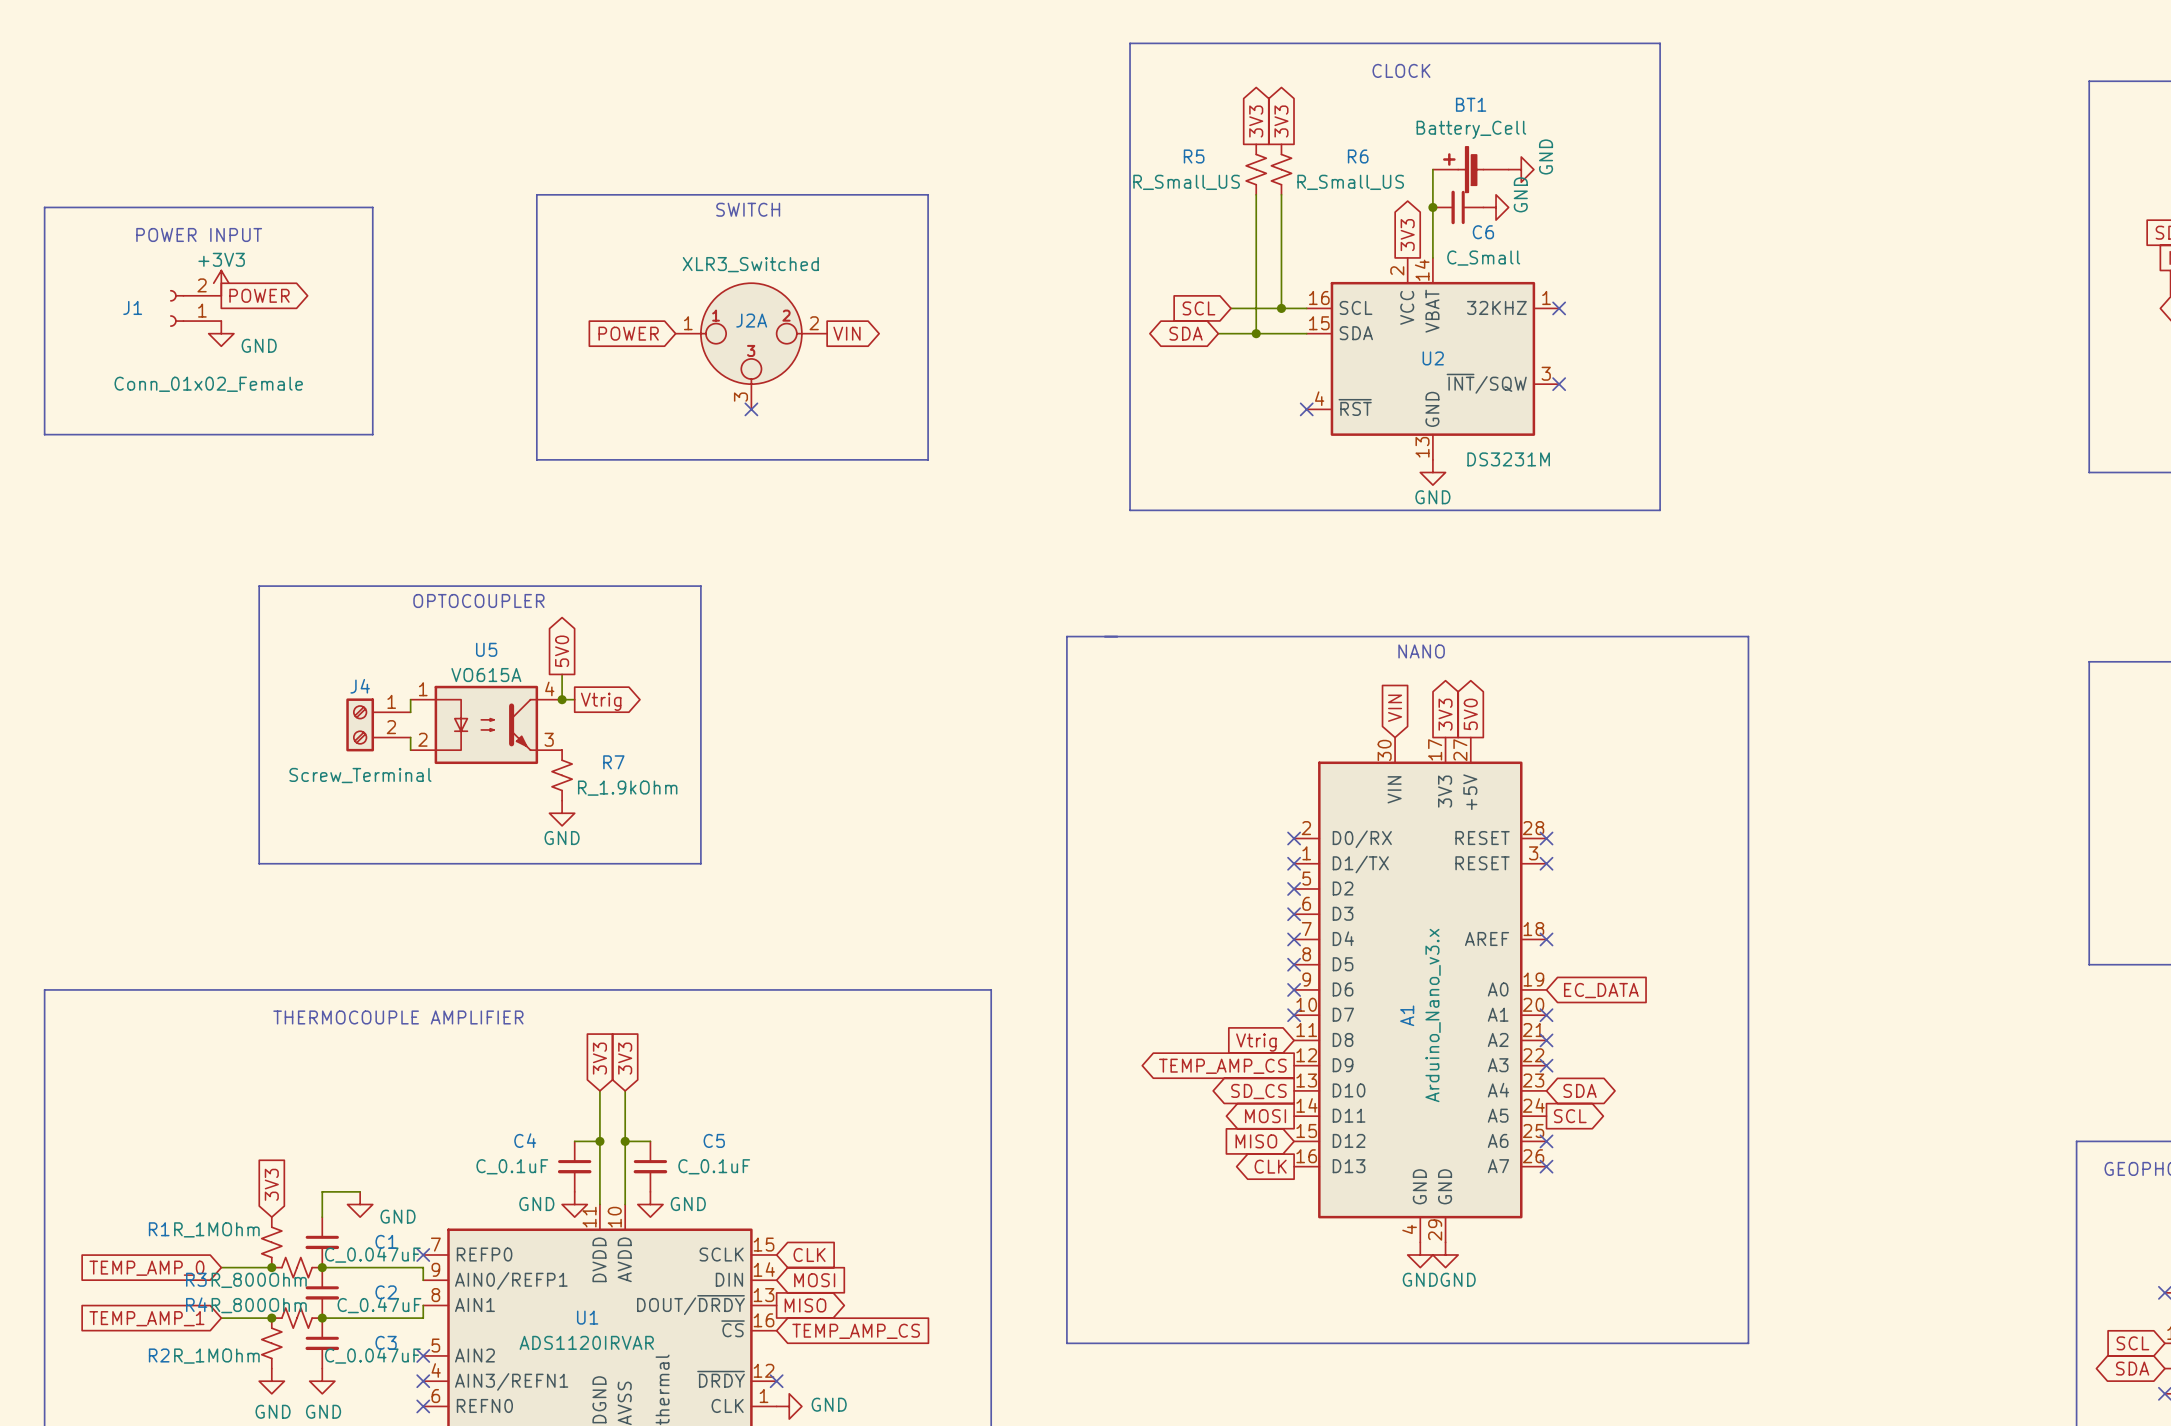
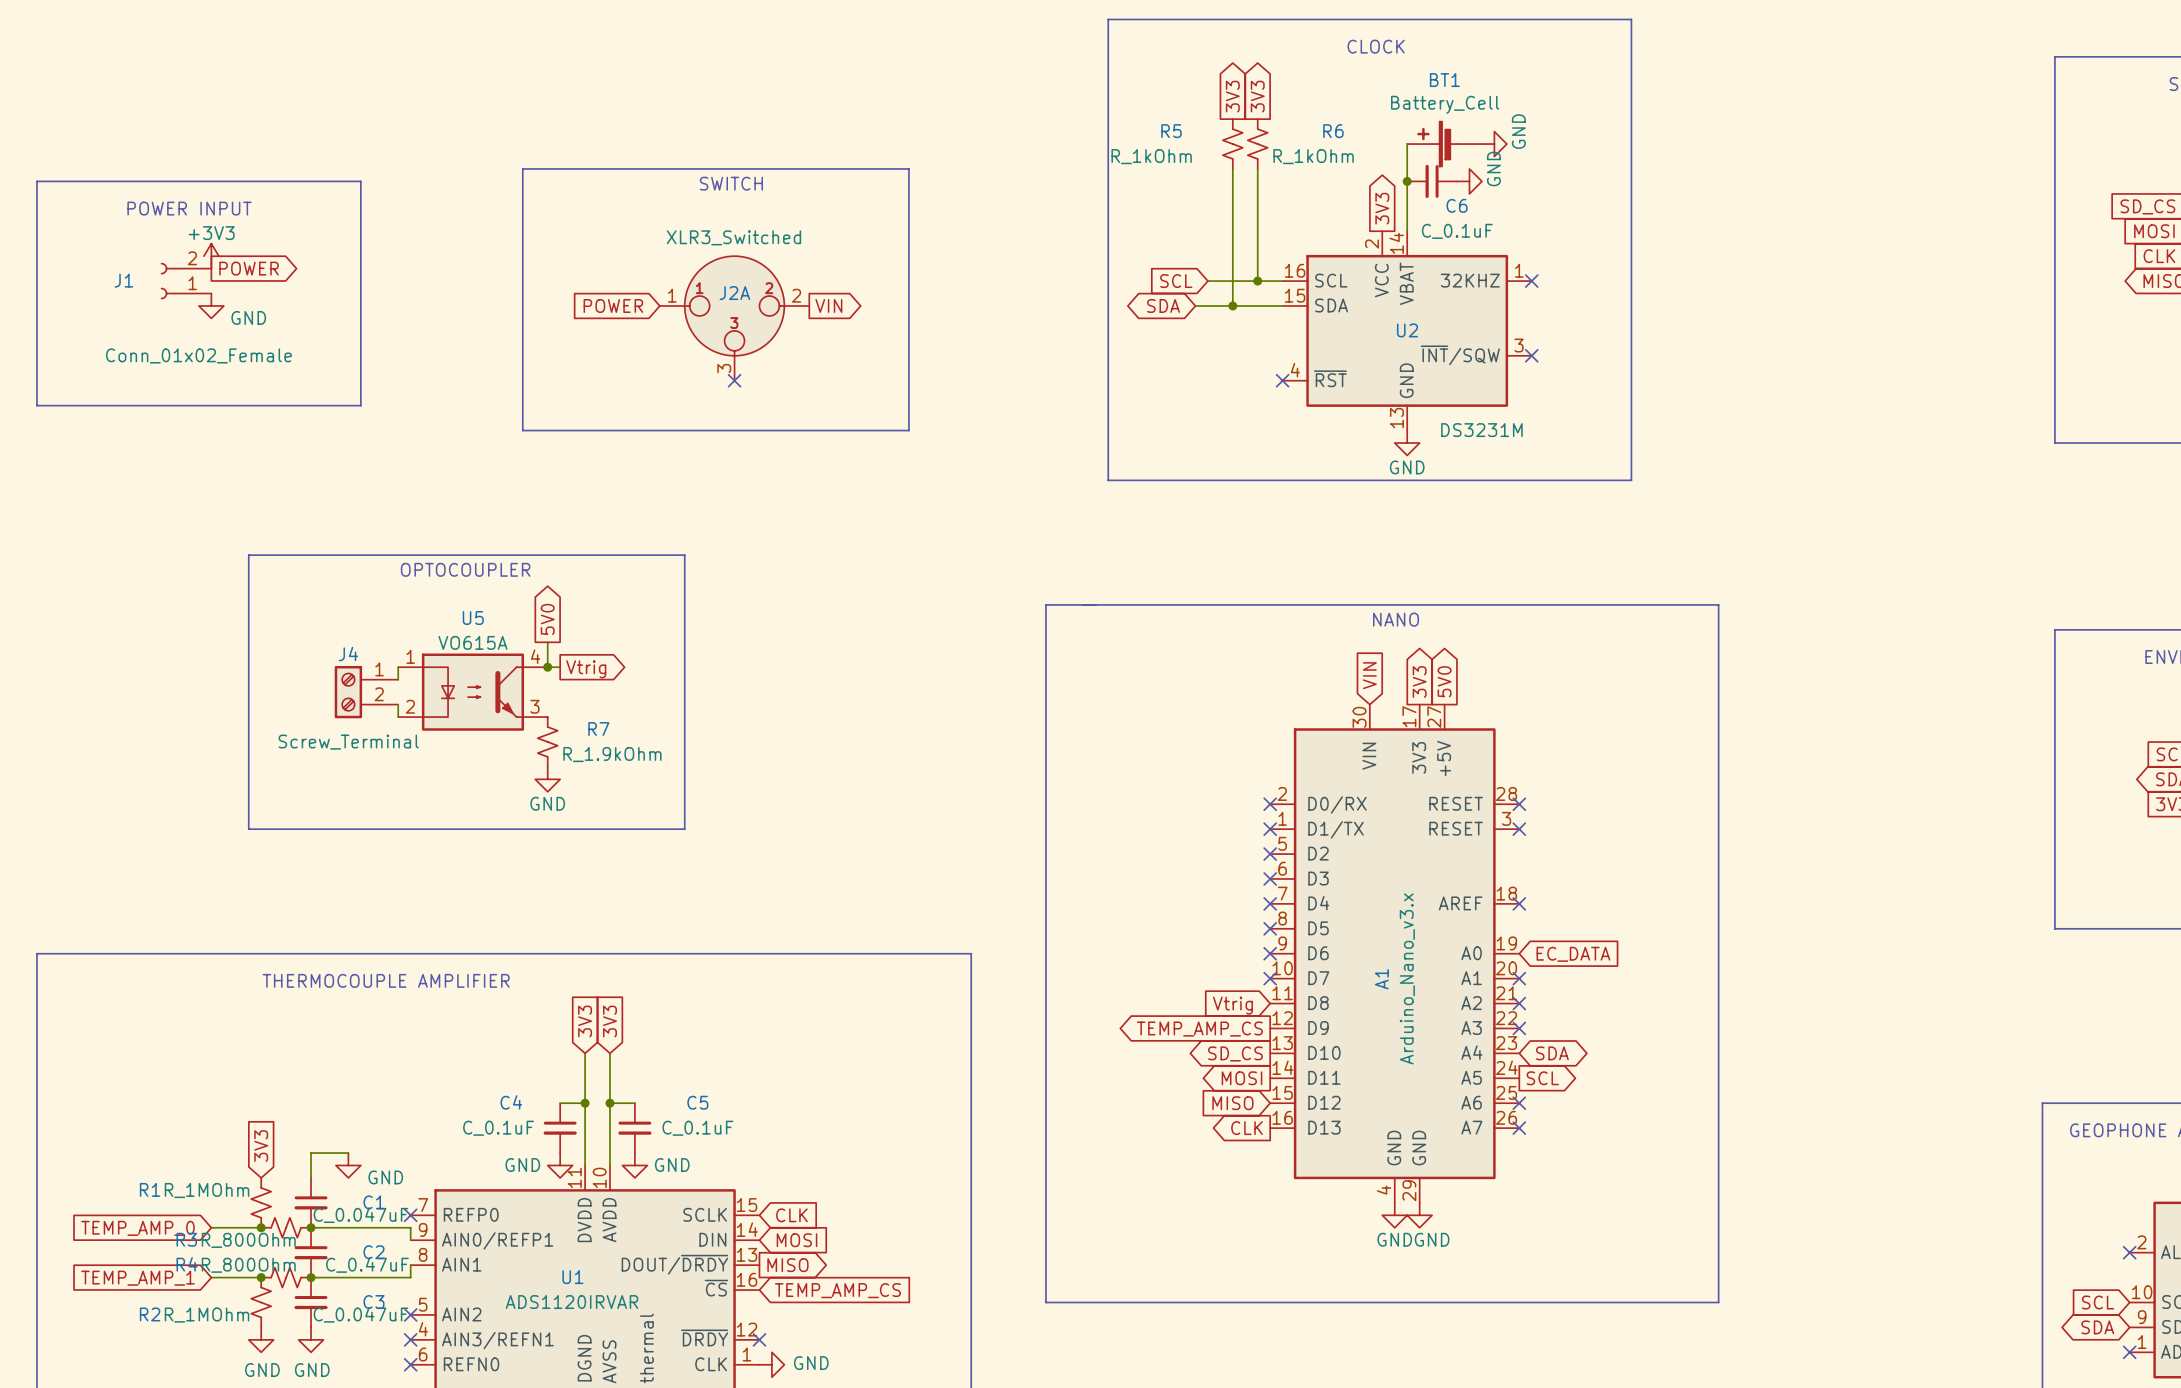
R5 value: R_Small_US (1186, 182) -> R_1kOhm (1151, 156)
R6 value: R_Small_US (1350, 182) -> R_1kOhm (1313, 156)
C6 value: C_Small (1483, 258) -> C_0.1uF (1457, 231)

